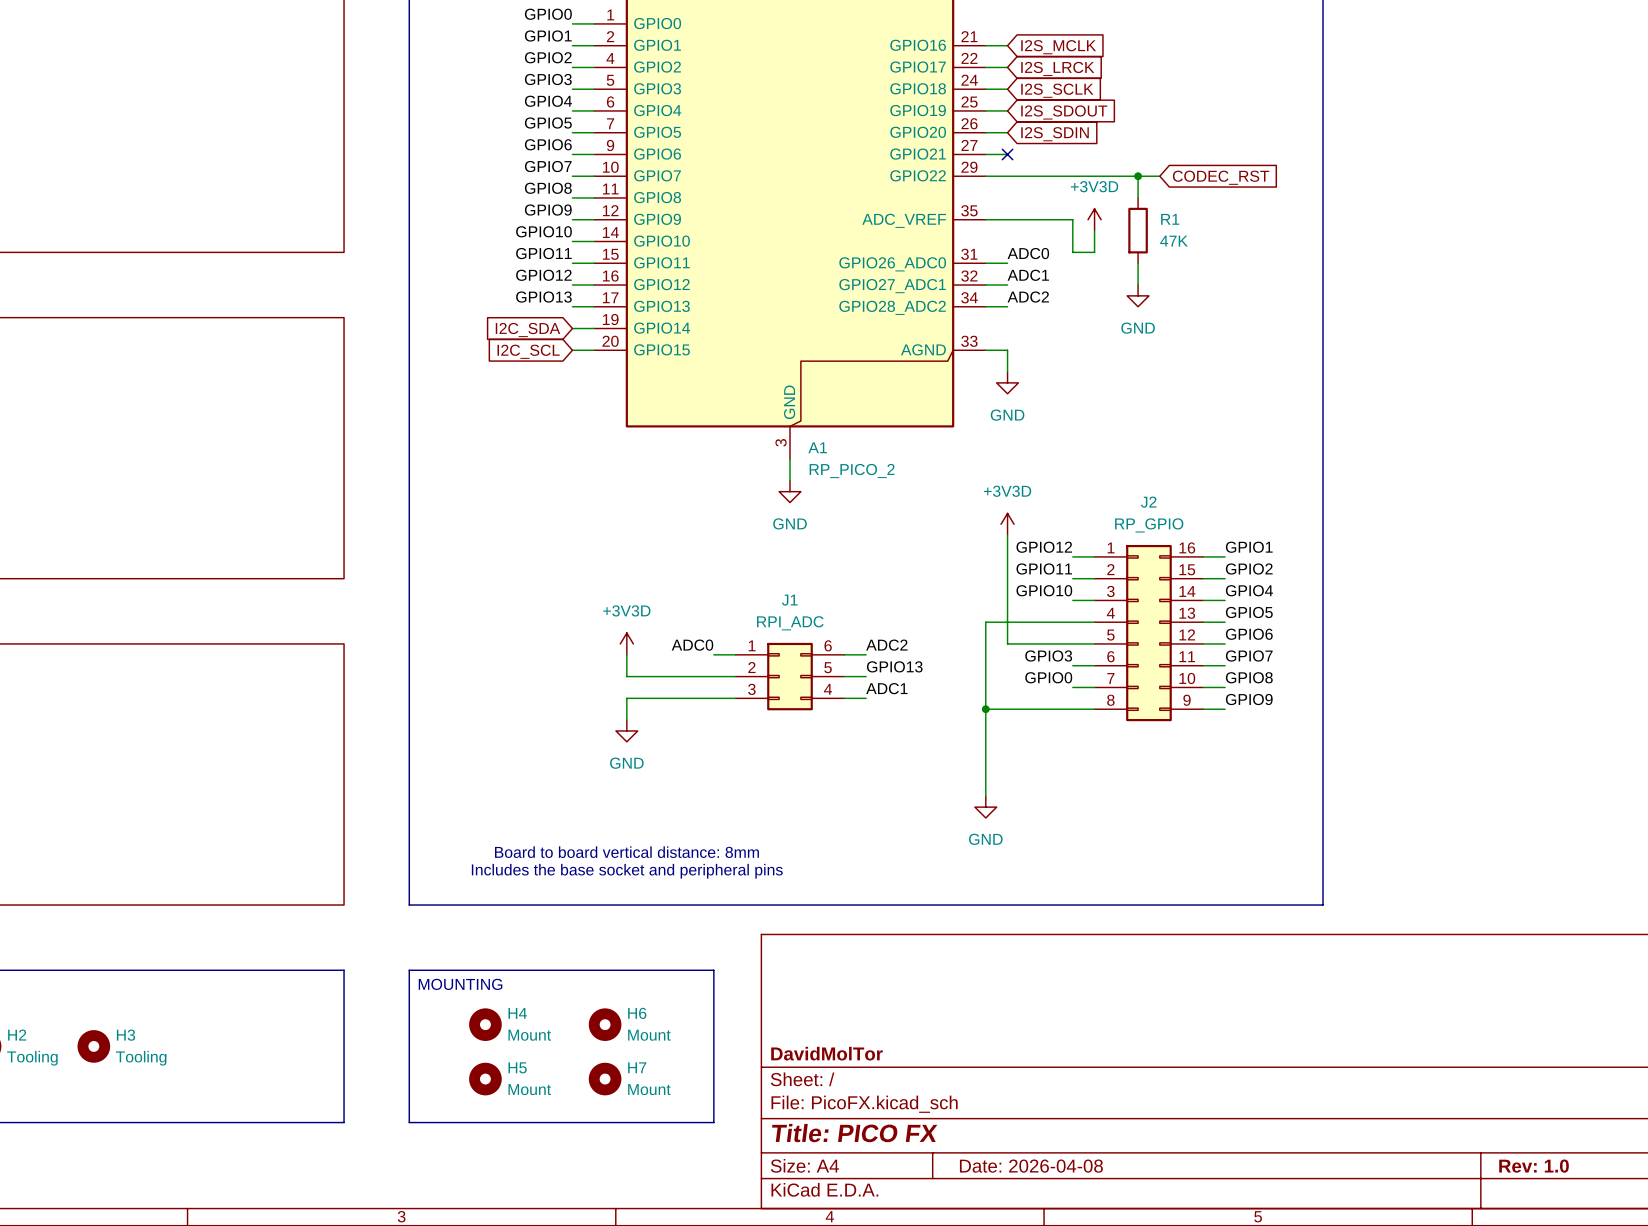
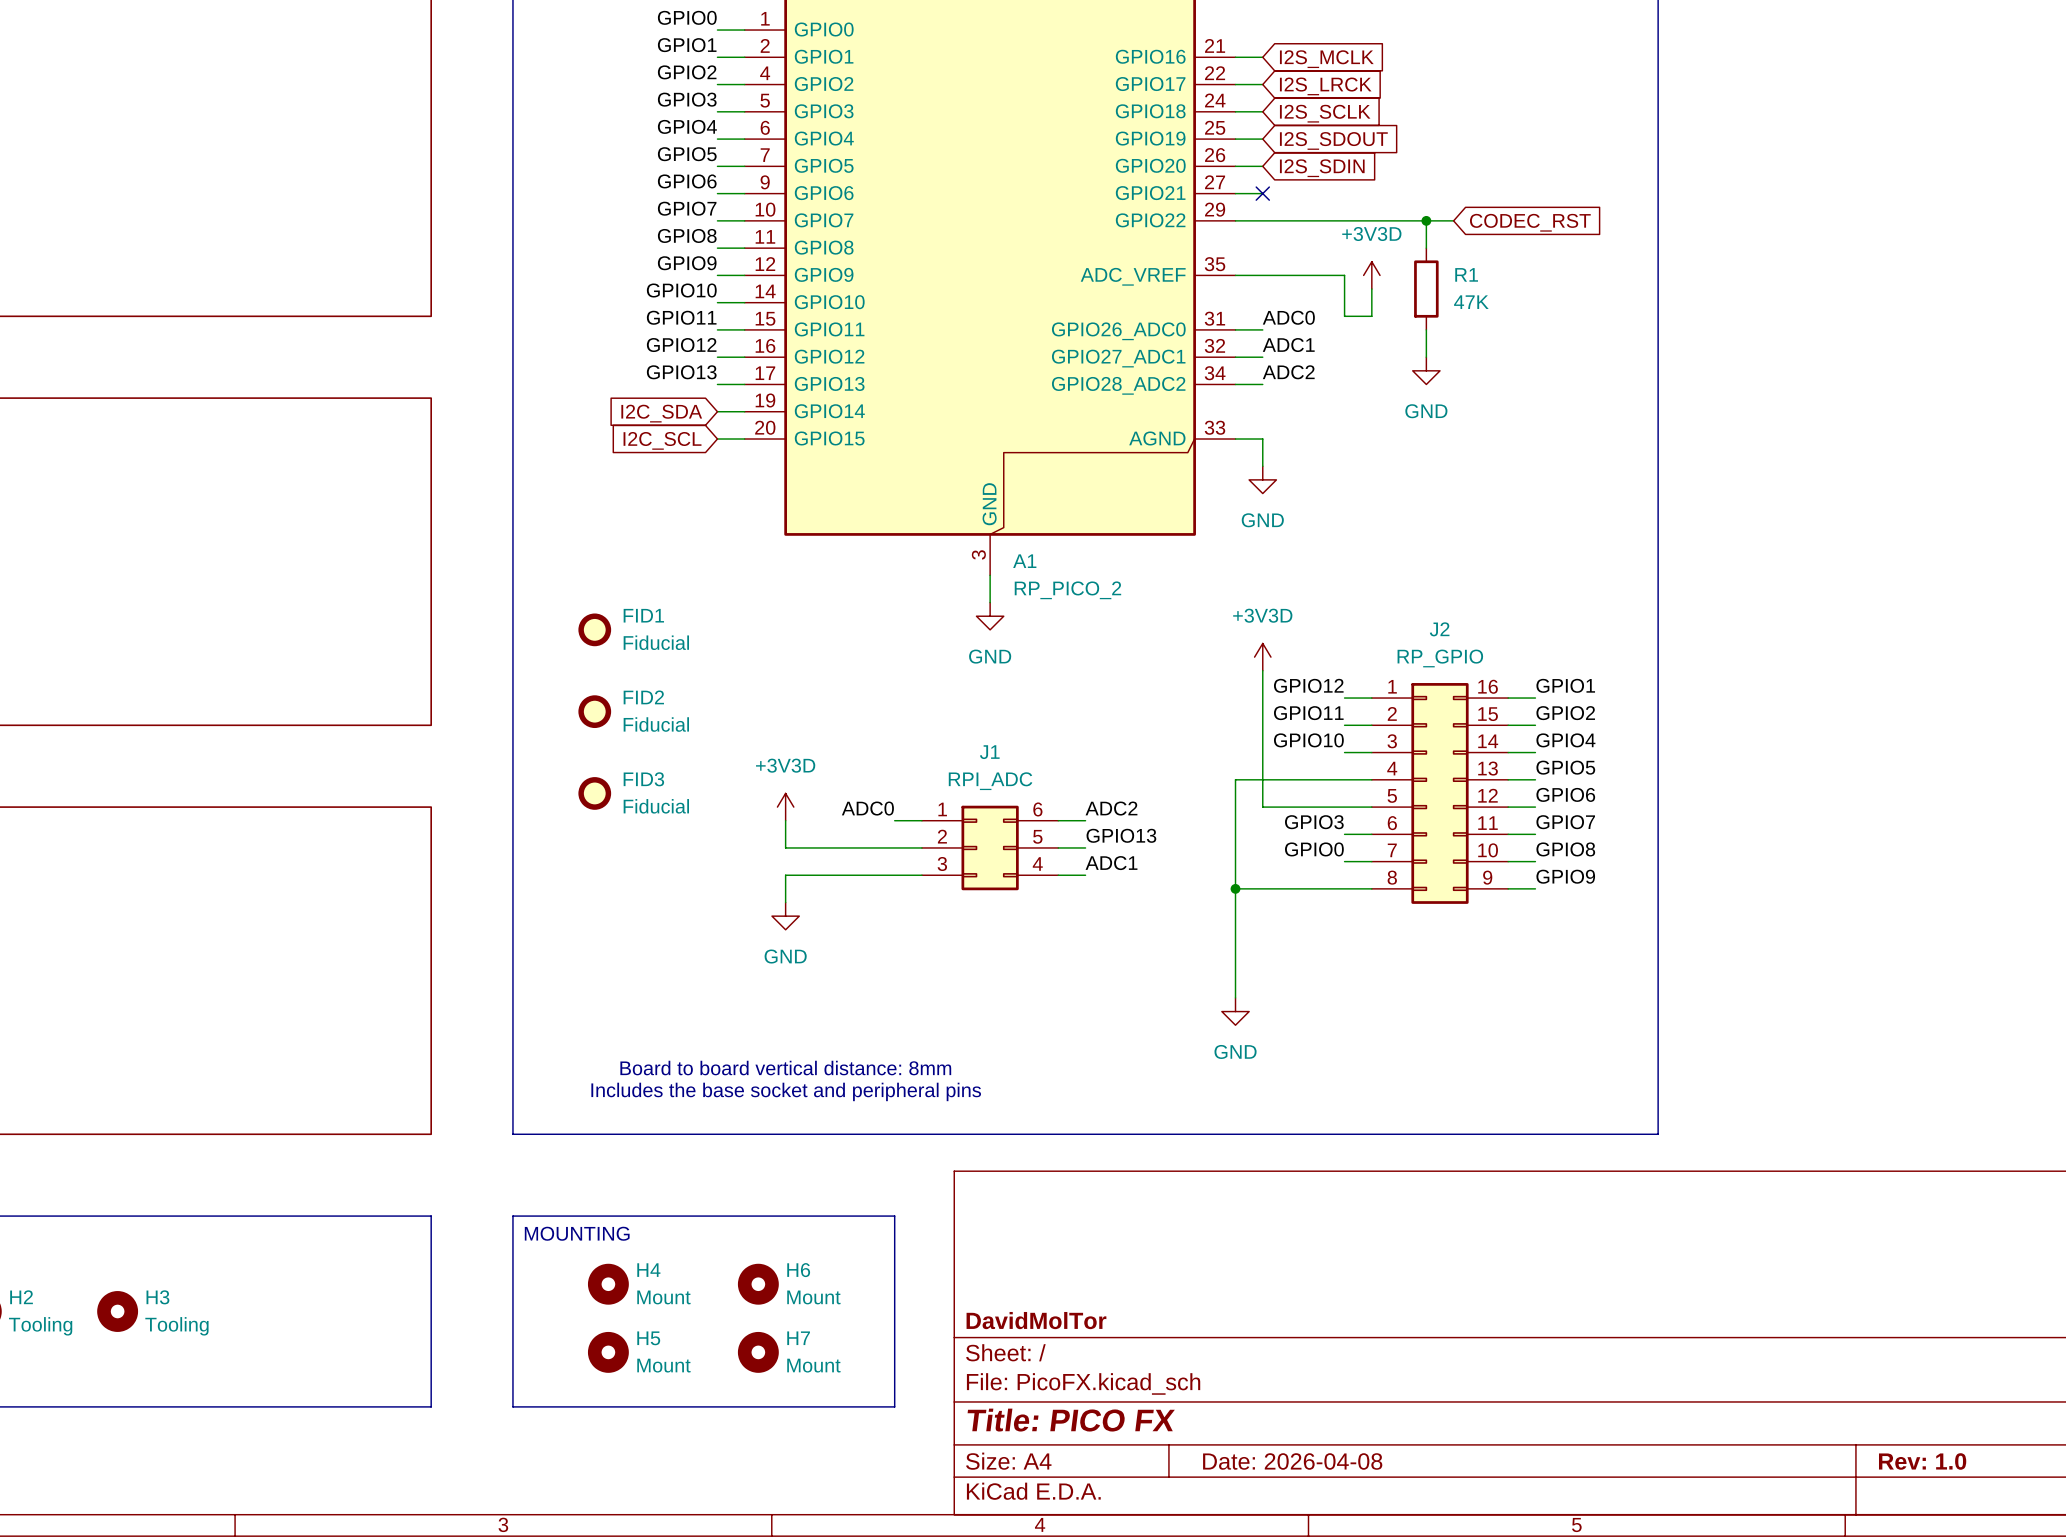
FID1: none -> Fiducial (594, 629)
FID2: none -> Fiducial (594, 711)
FID3: none -> Fiducial (594, 793)

